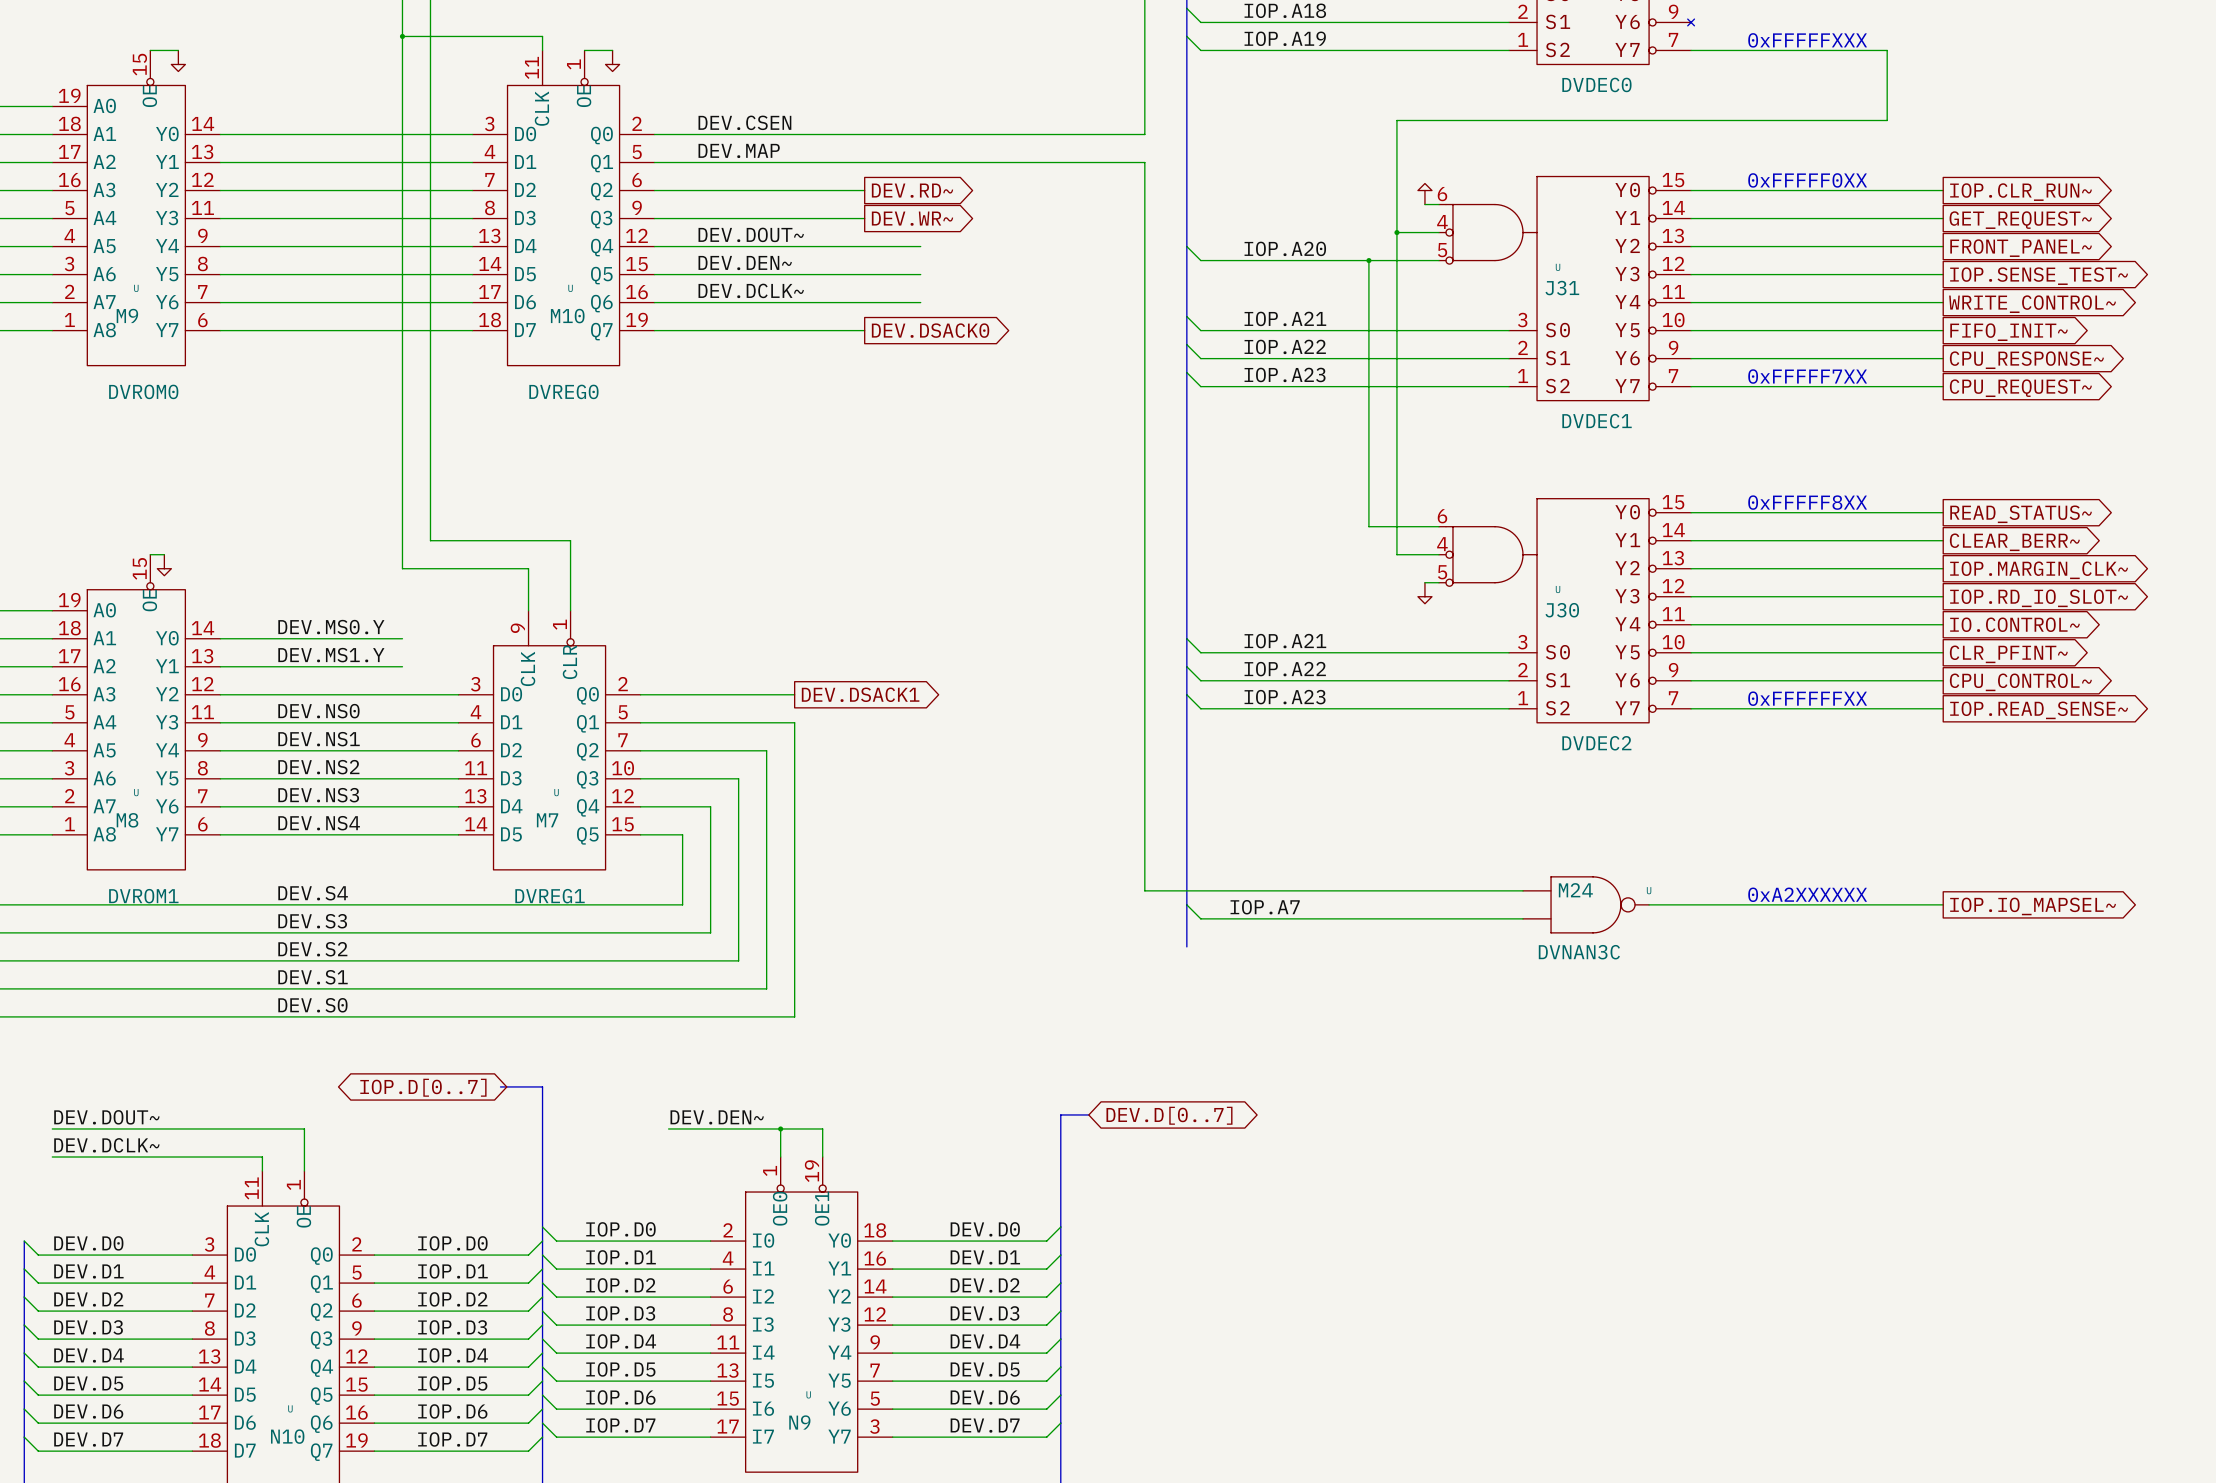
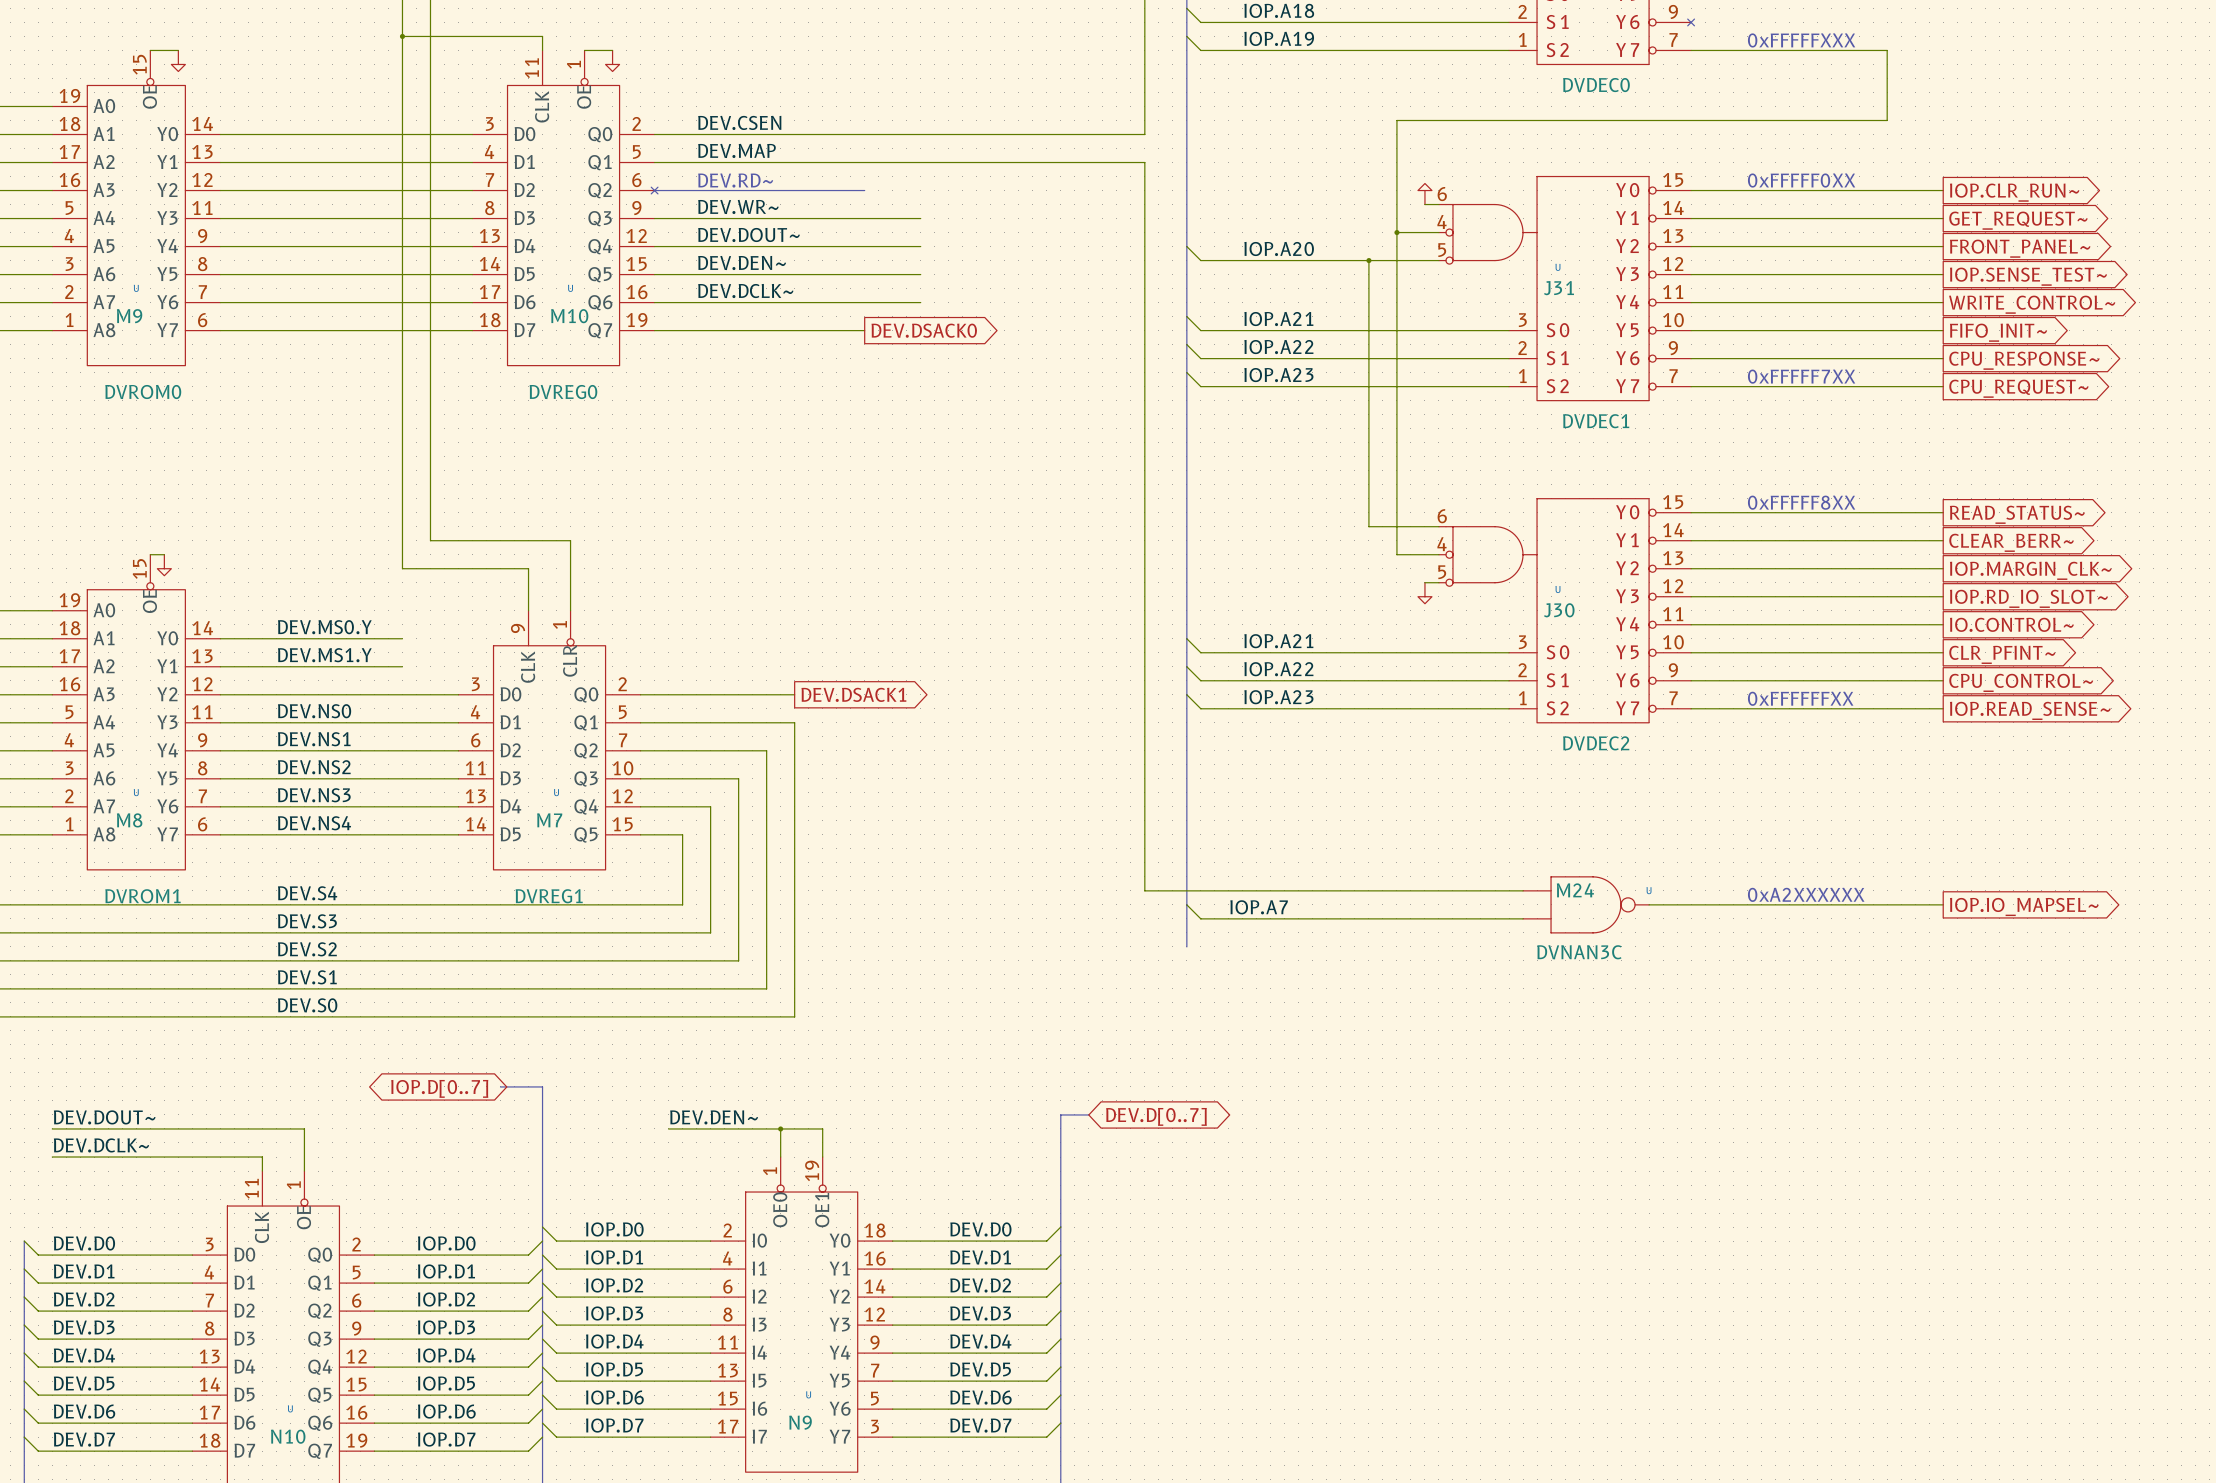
text: none -> DEV.RD~ (735, 180)
line: none -> (654, 190) (864, 190)
no-connect mark: none -> (654, 190)
global label: DEV.RD~ (912, 190) -> none
label: none -> DEV.WR~ (738, 206)
wire: none -> (864, 218) (920, 218)
global label: DEV.WR~ (912, 218) -> none

